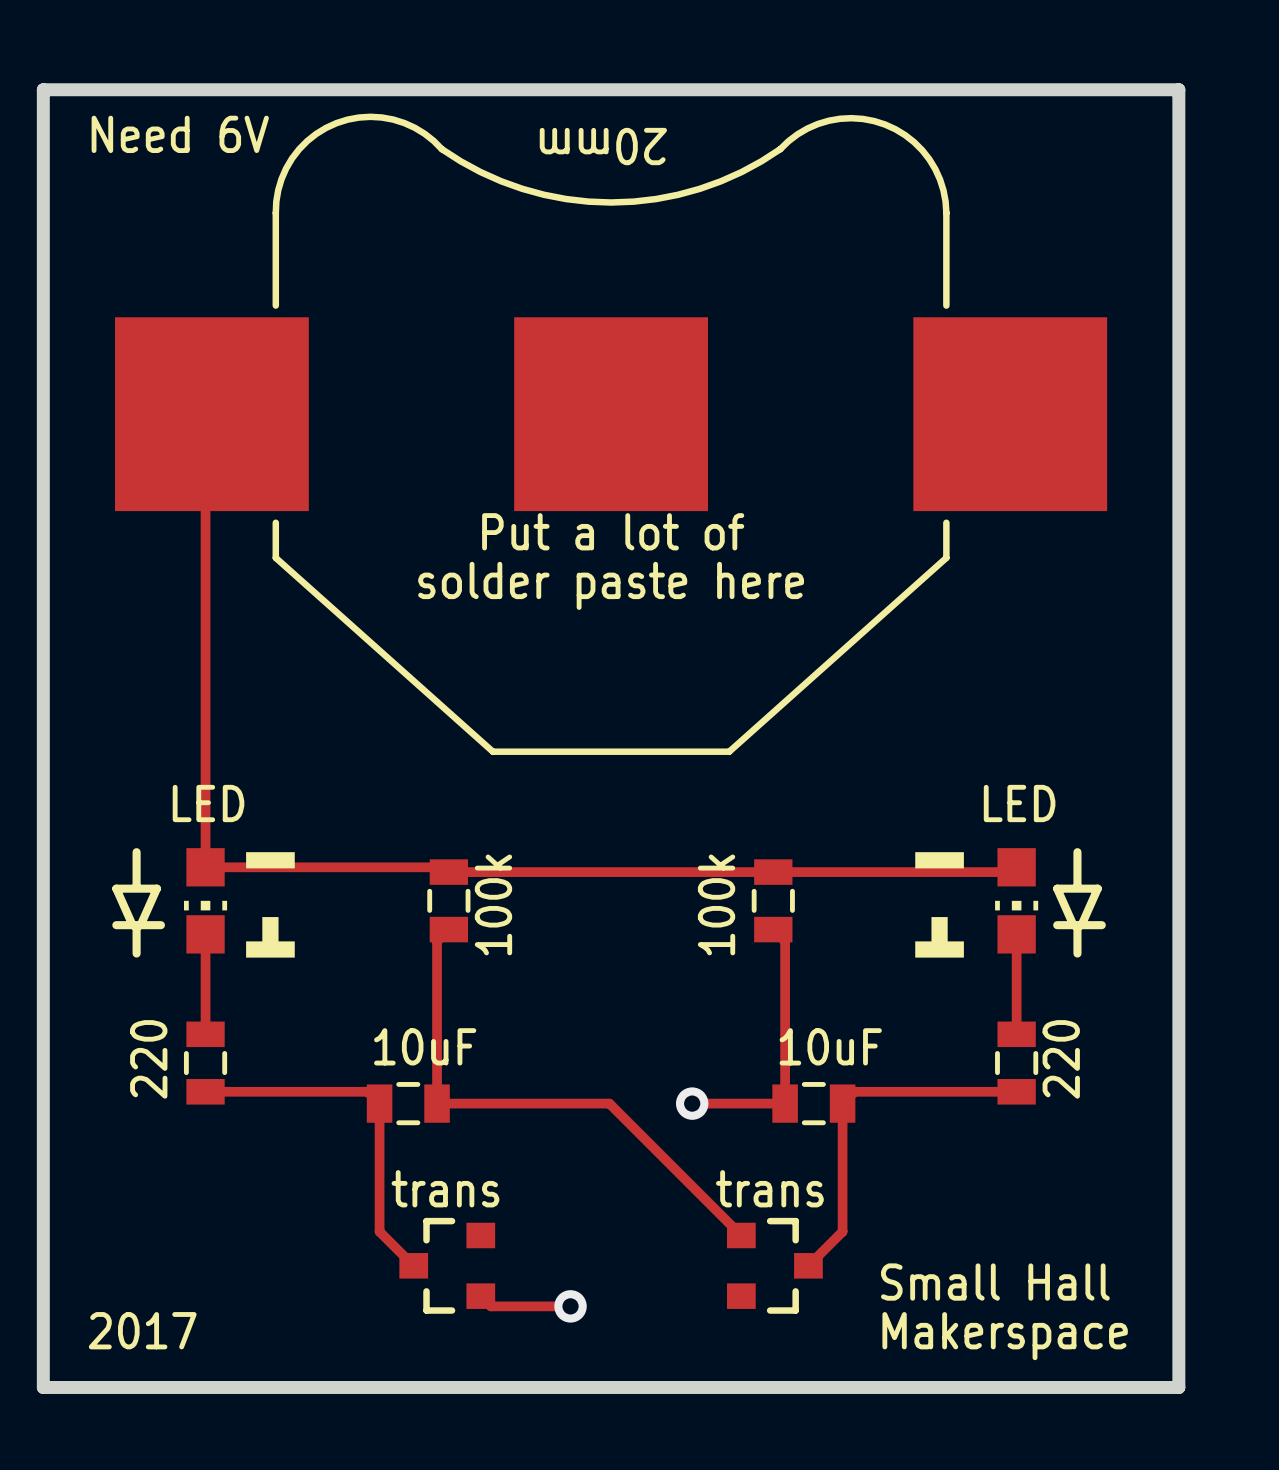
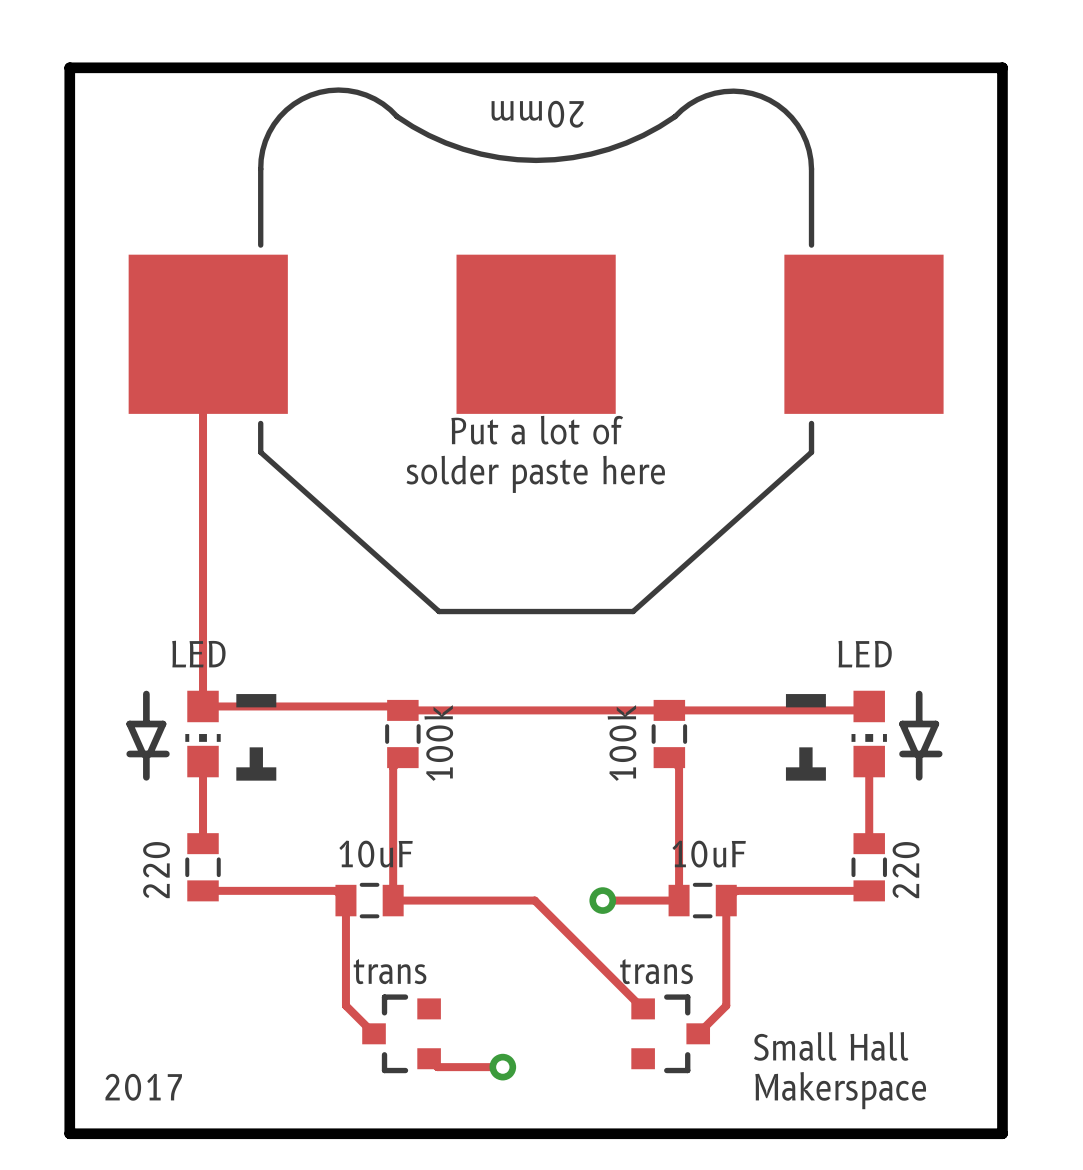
text: Need 6V (180, 134) -> none

